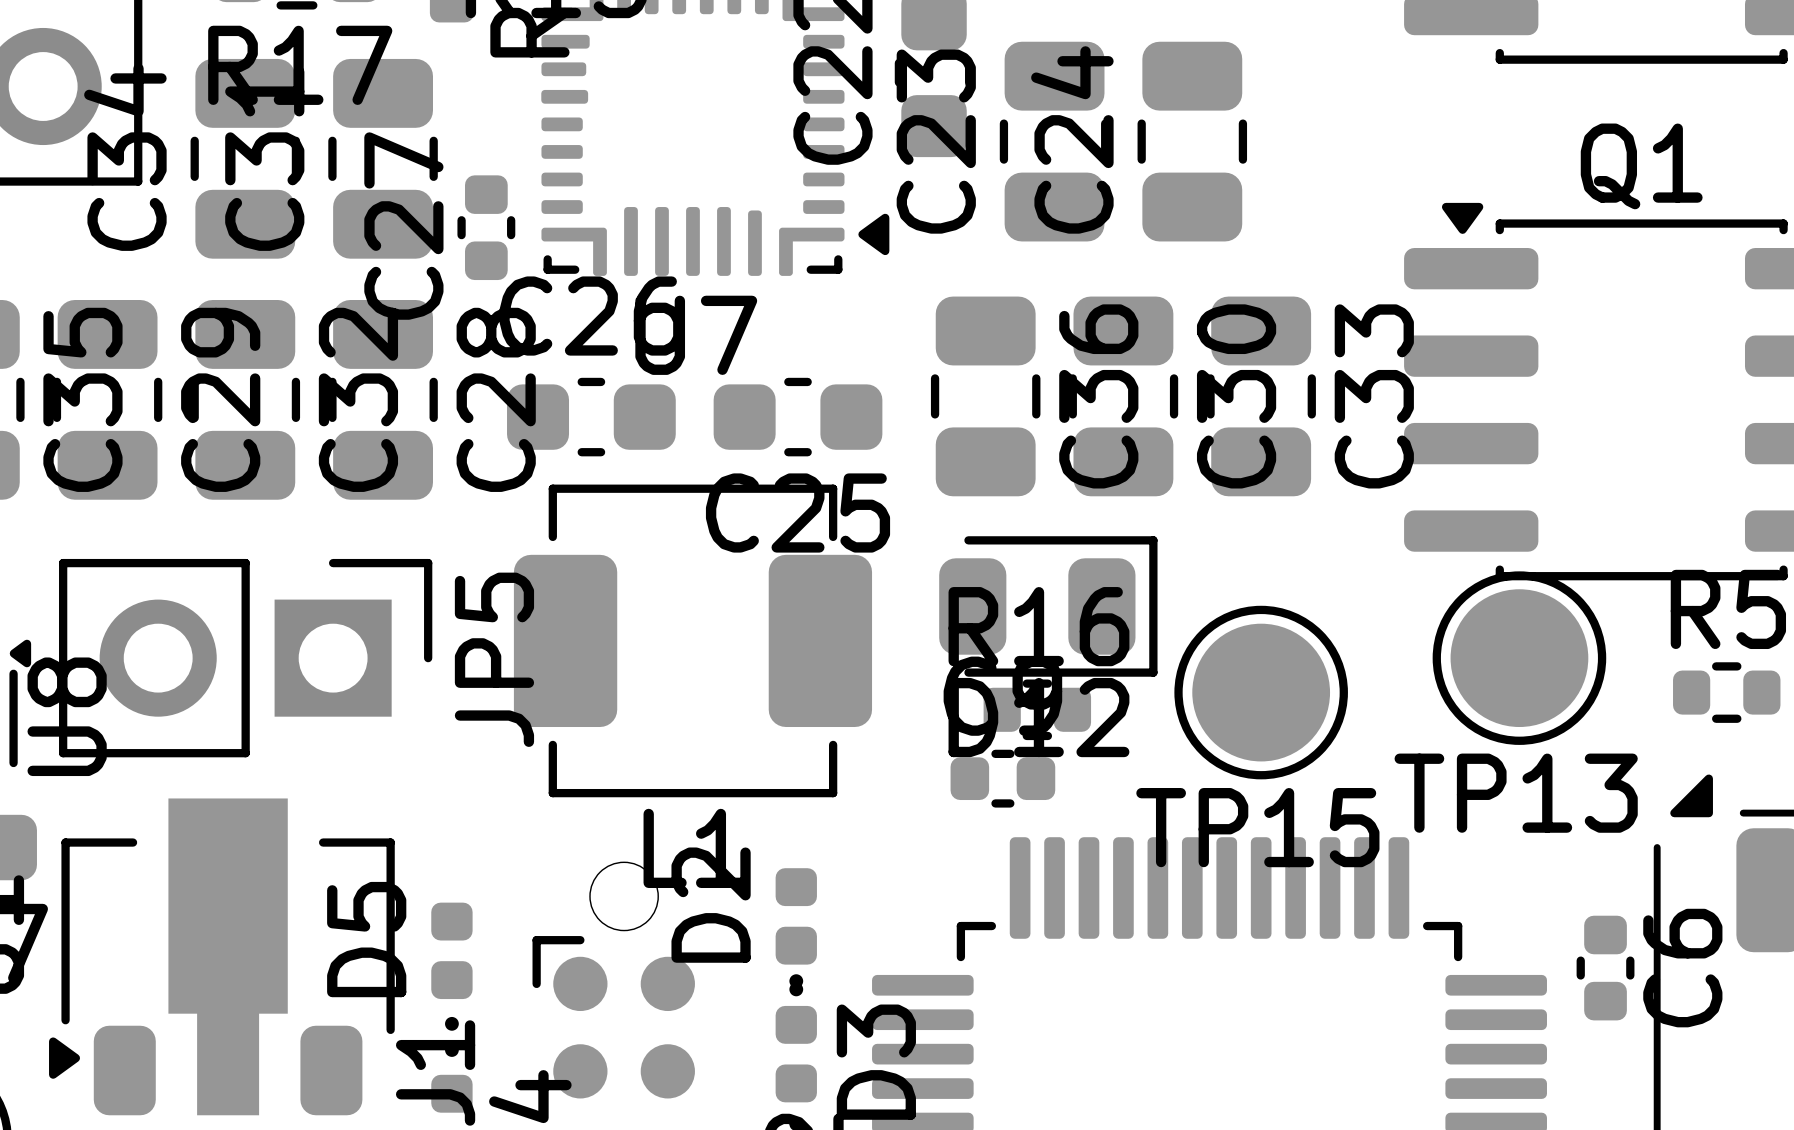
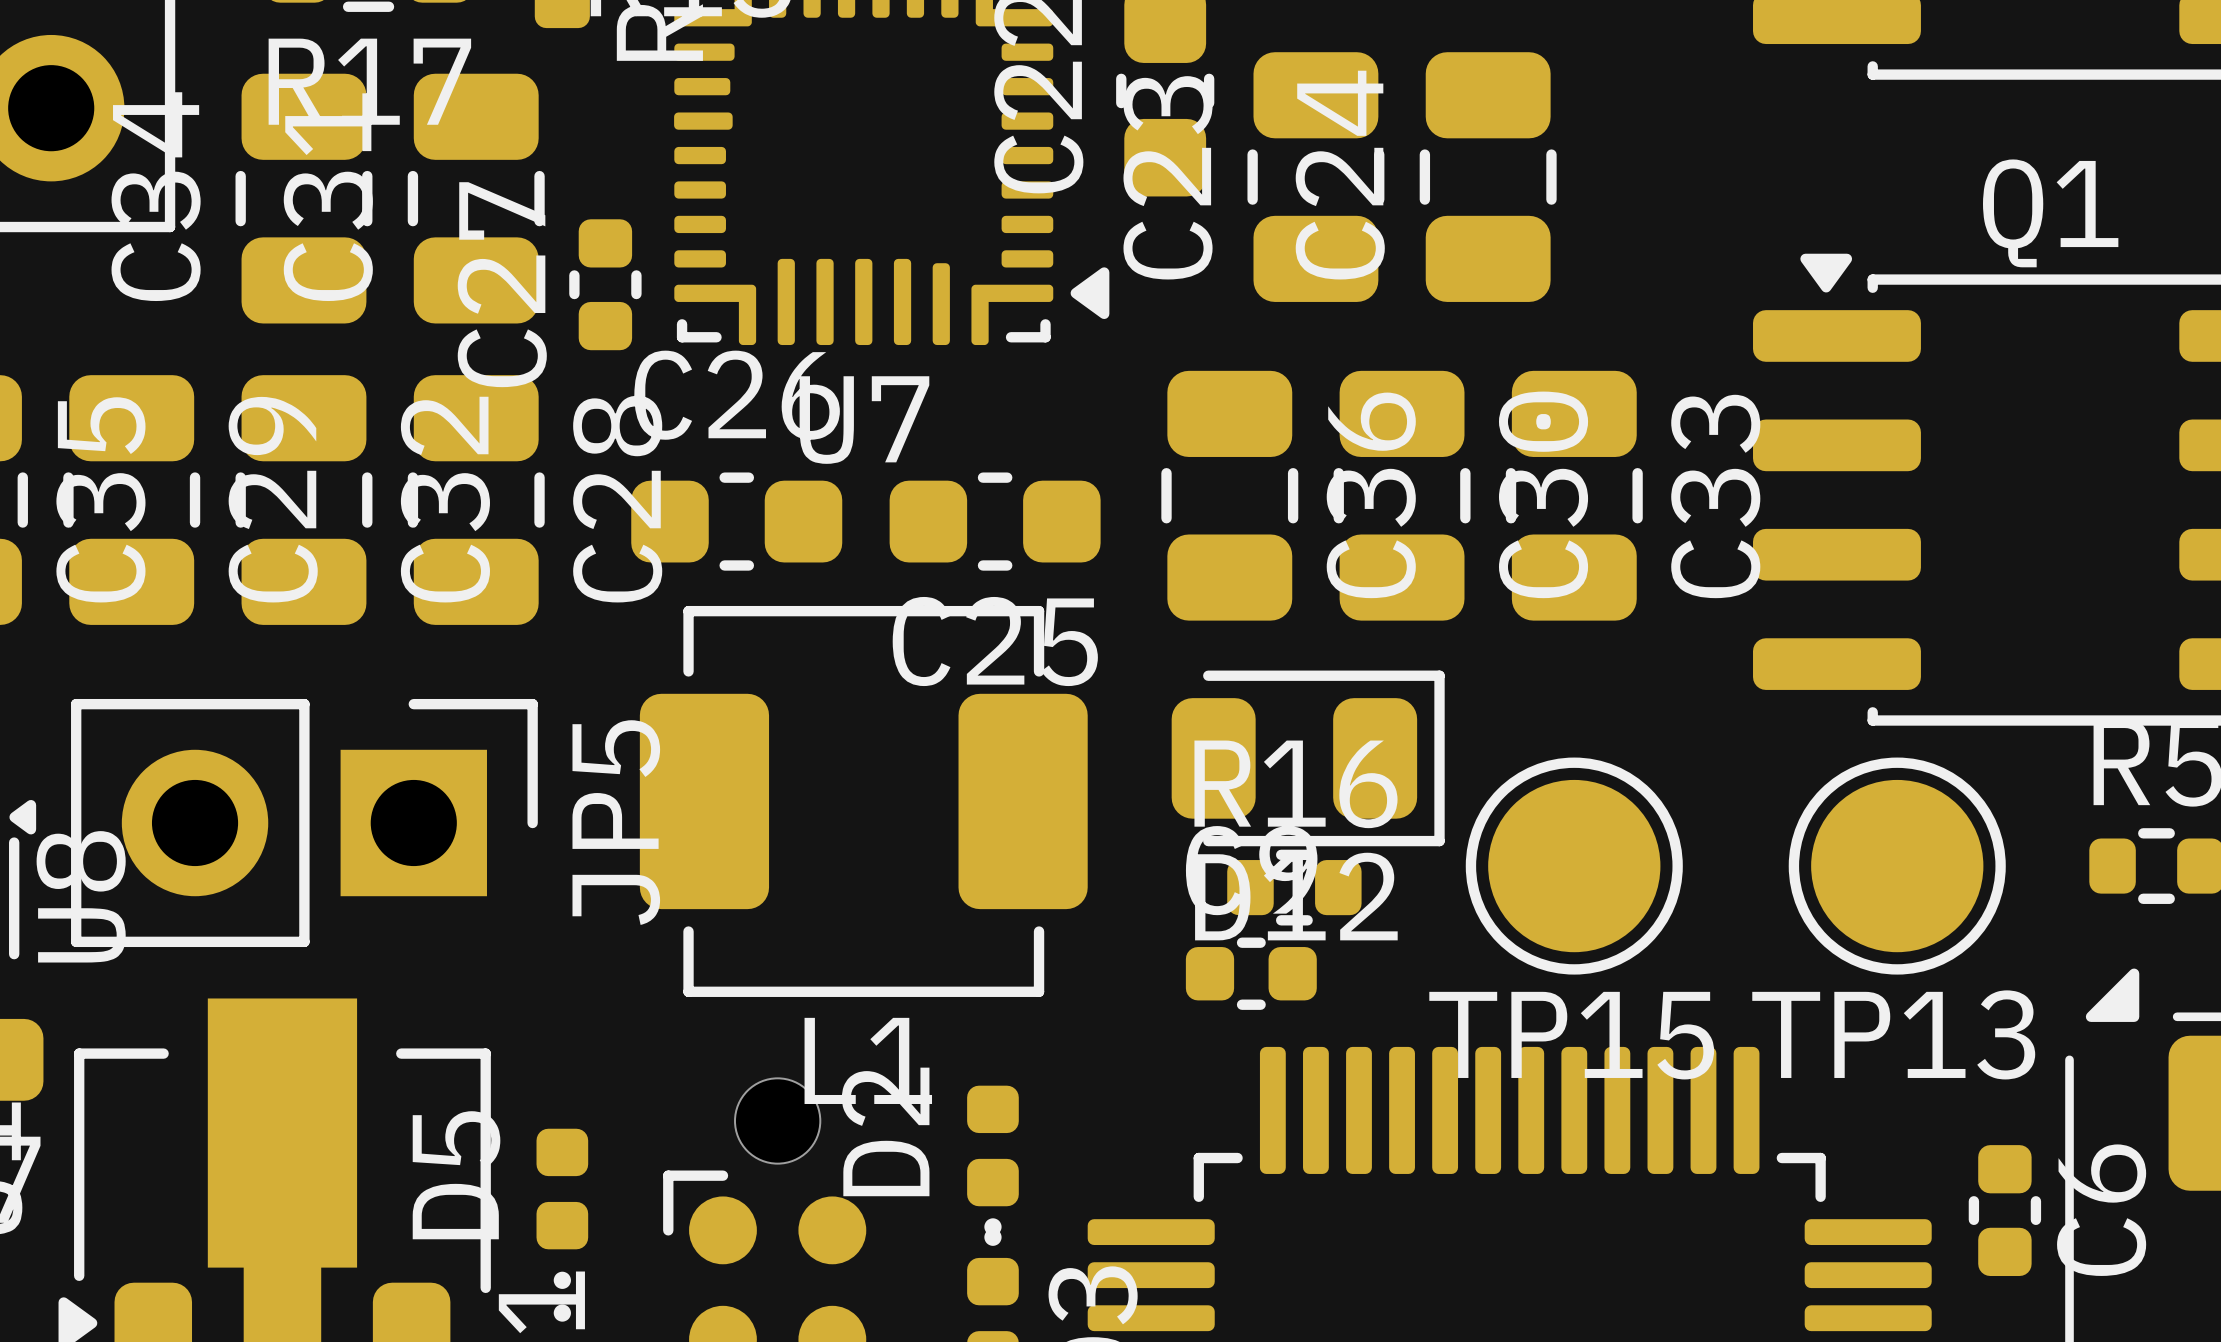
TP13 position: (1519, 658) -> (1897, 866)

